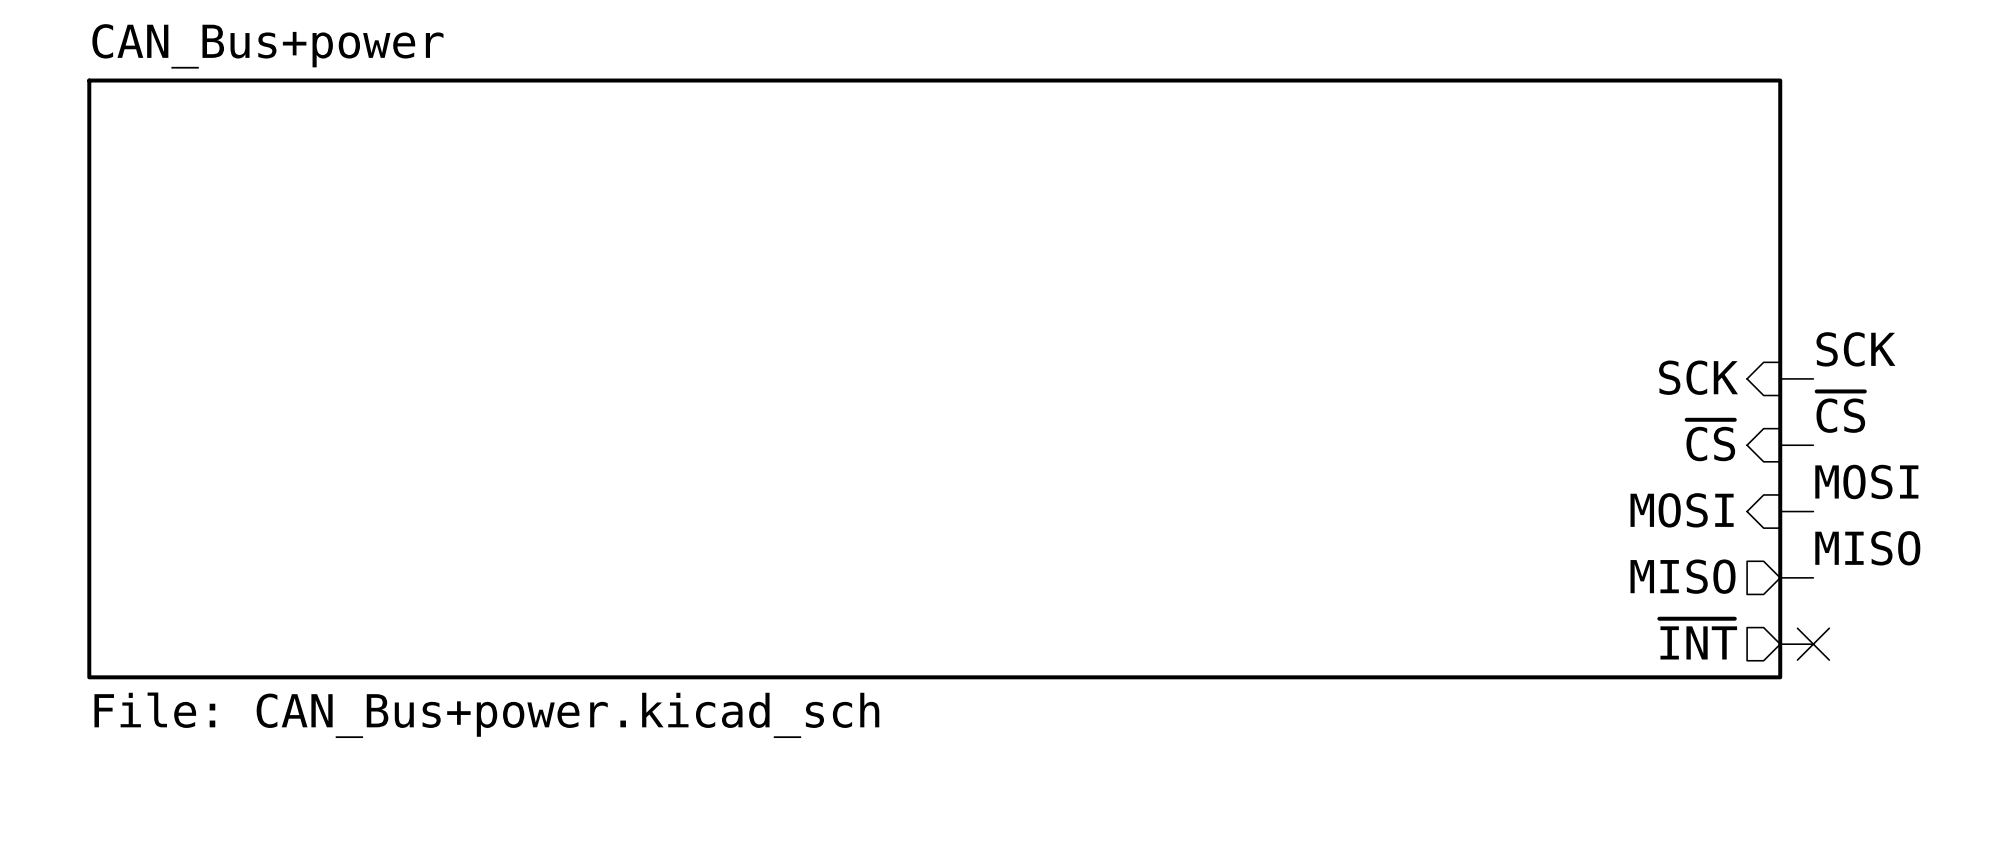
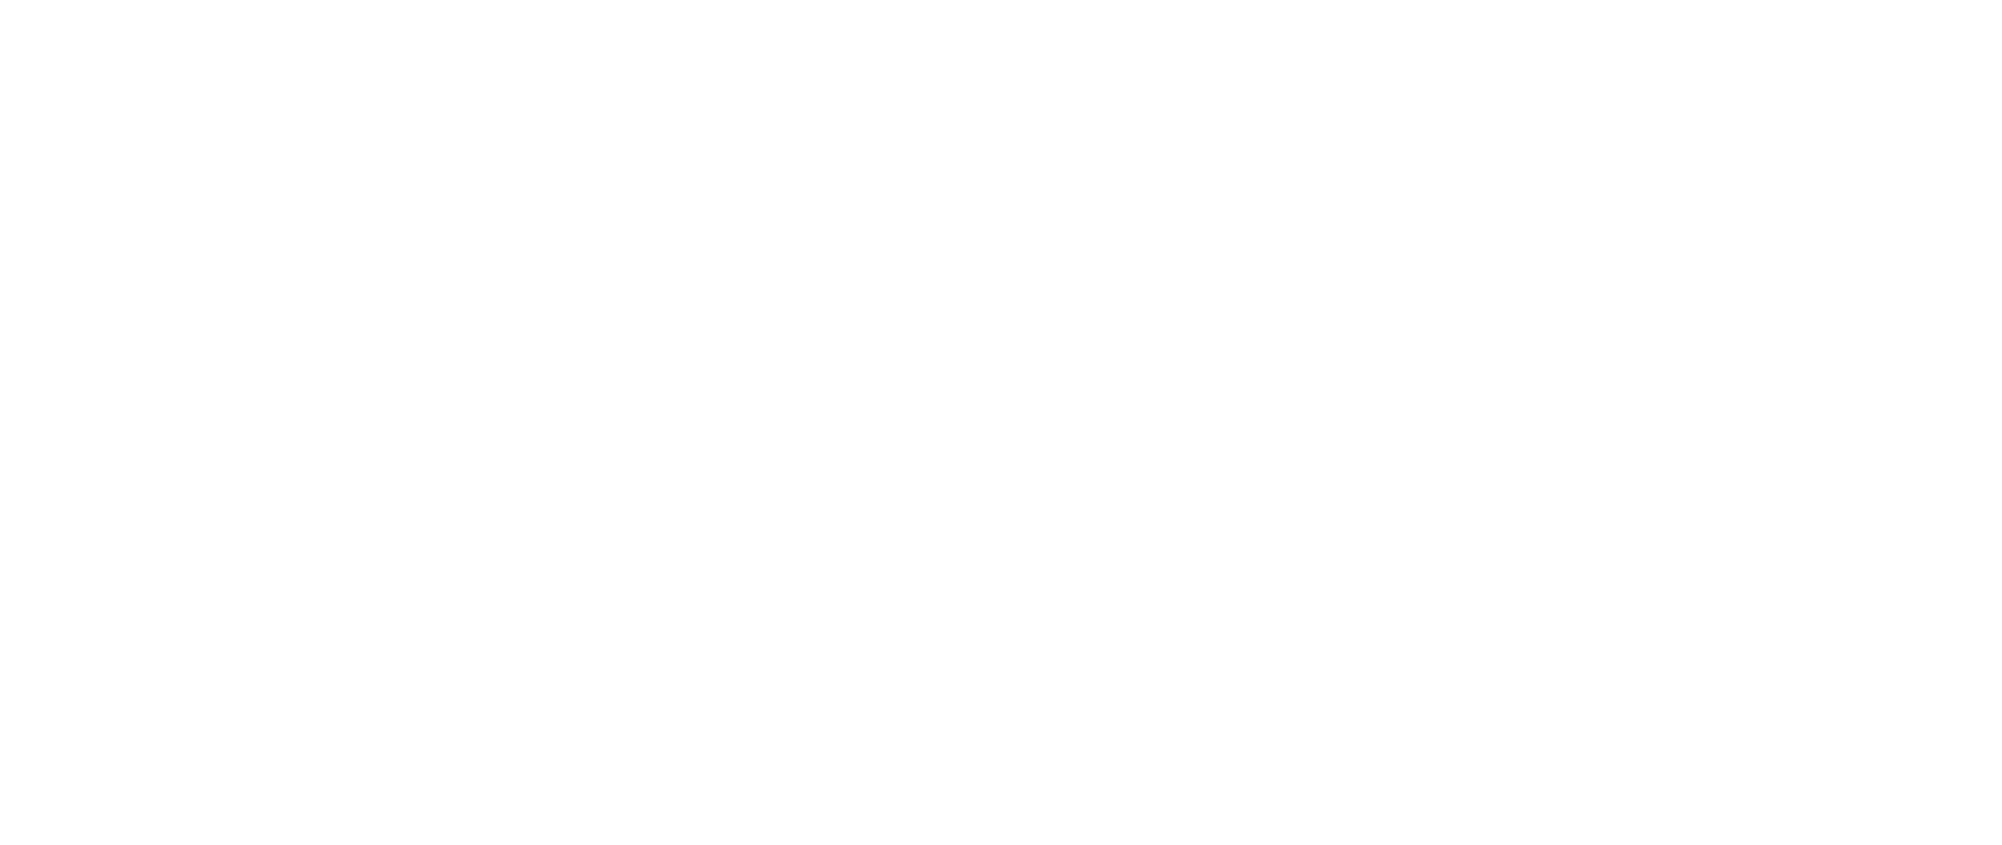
label: SCK (1855, 349) -> none
sheet pin: SCK (1698, 377) -> none
sheet CAN_Bus+power: File: CAN_Bus+power.kicad_sch (934, 378) -> none
wire: (1780, 378) (1813, 378) -> none
label: ~{CS} (1840, 412) -> none
sheet pin: ~{CS} (1710, 440) -> none
wire: (1780, 445) (1813, 445) -> none
label: MOSI (1866, 481) -> none
sheet pin: MOSI (1682, 510) -> none
wire: (1780, 511) (1813, 511) -> none
label: MISO (1867, 548) -> none
sheet pin: MISO (1683, 576) -> none
wire: (1780, 577) (1813, 577) -> none
sheet pin: ~{INT} (1698, 639) -> none
wire: (1780, 644) (1813, 644) -> none
no-connect mark: (1813, 644) -> none

